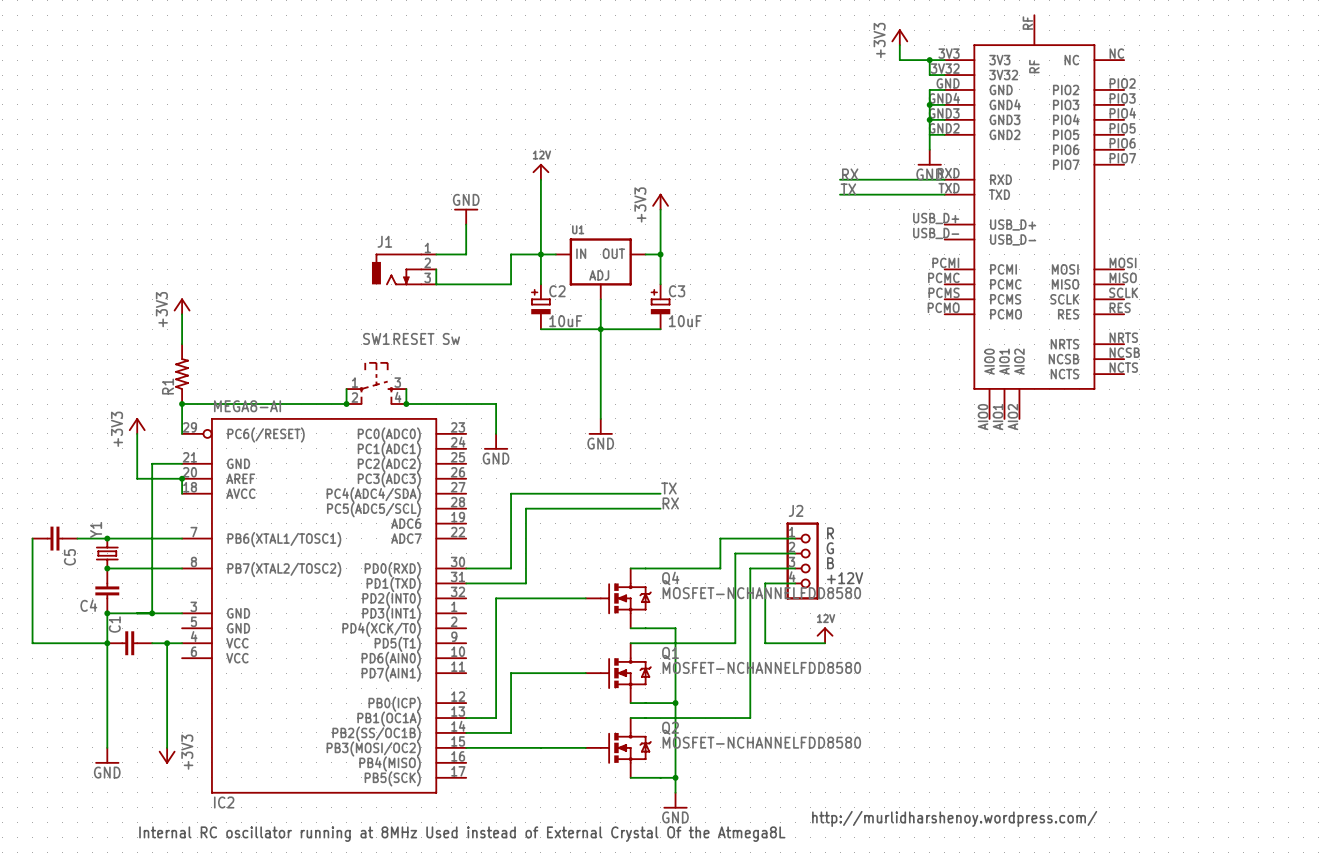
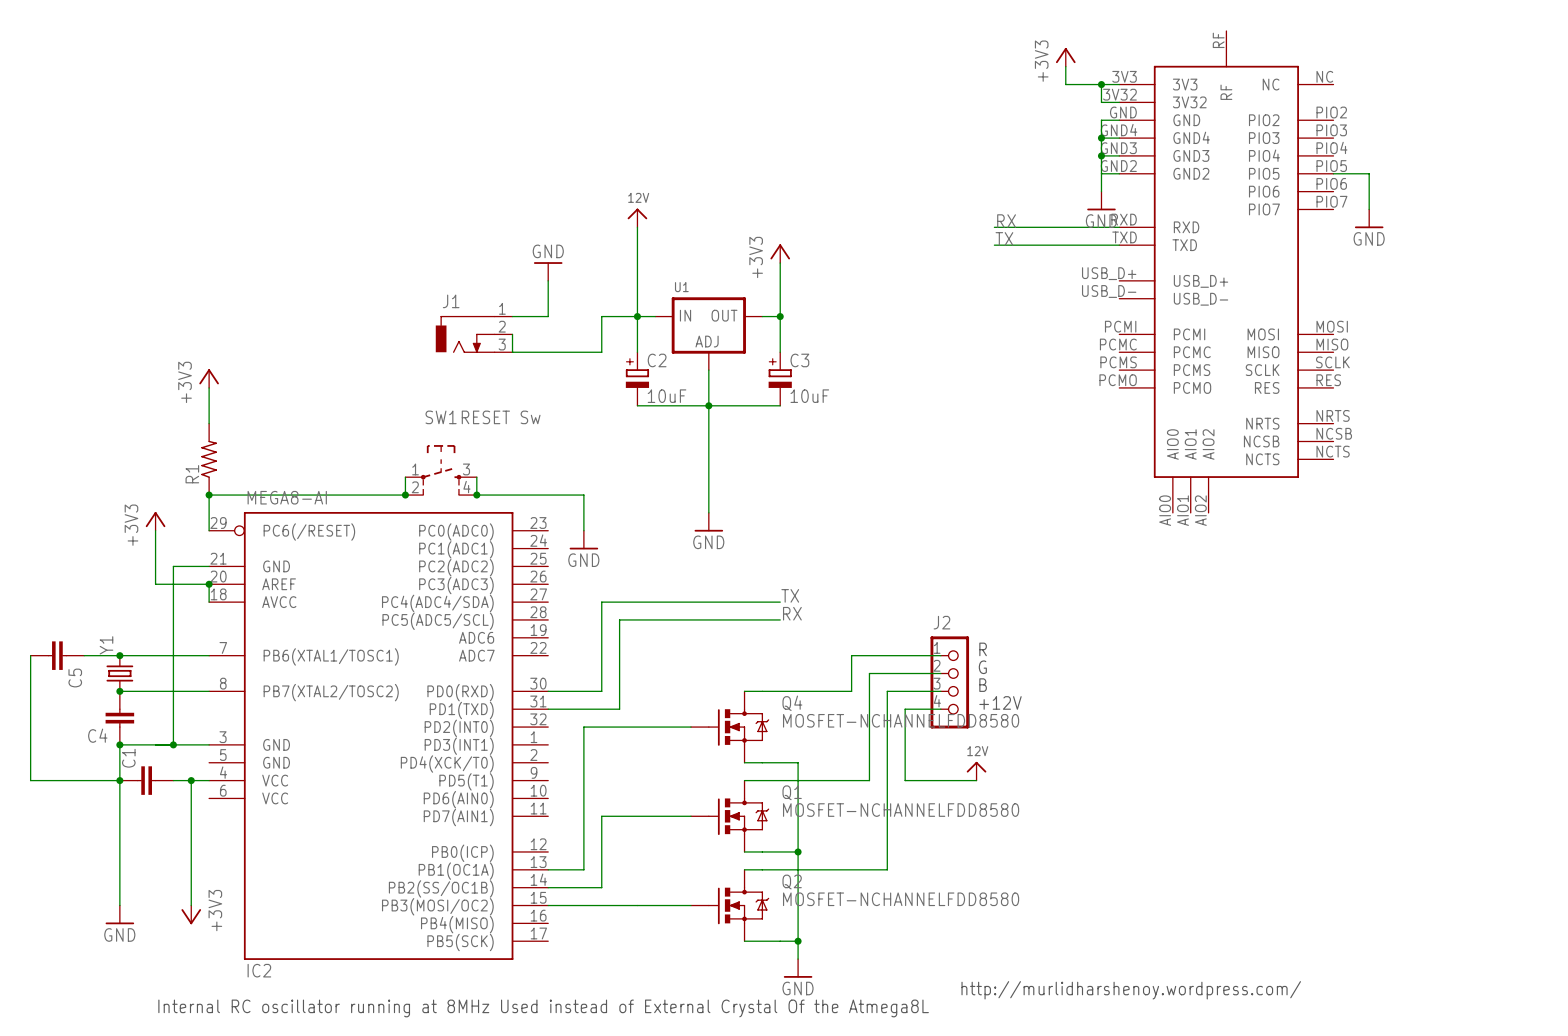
wire: none -> (1333, 173) (1369, 173) (1369, 209)
power symbol: none -> GND (1369, 218)

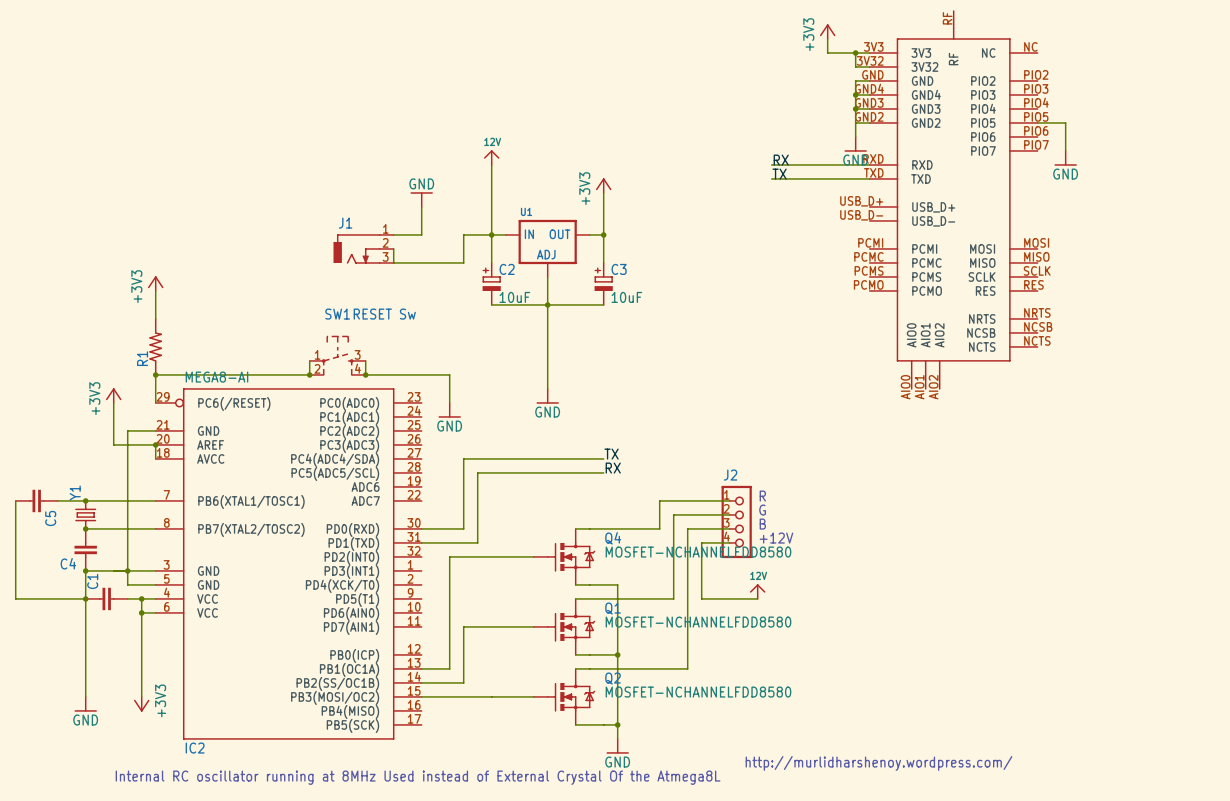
wire: none -> (127, 570) (127, 584) (155, 584)
wire: none -> (141, 612) (155, 612)
junction: none -> (141, 612)

